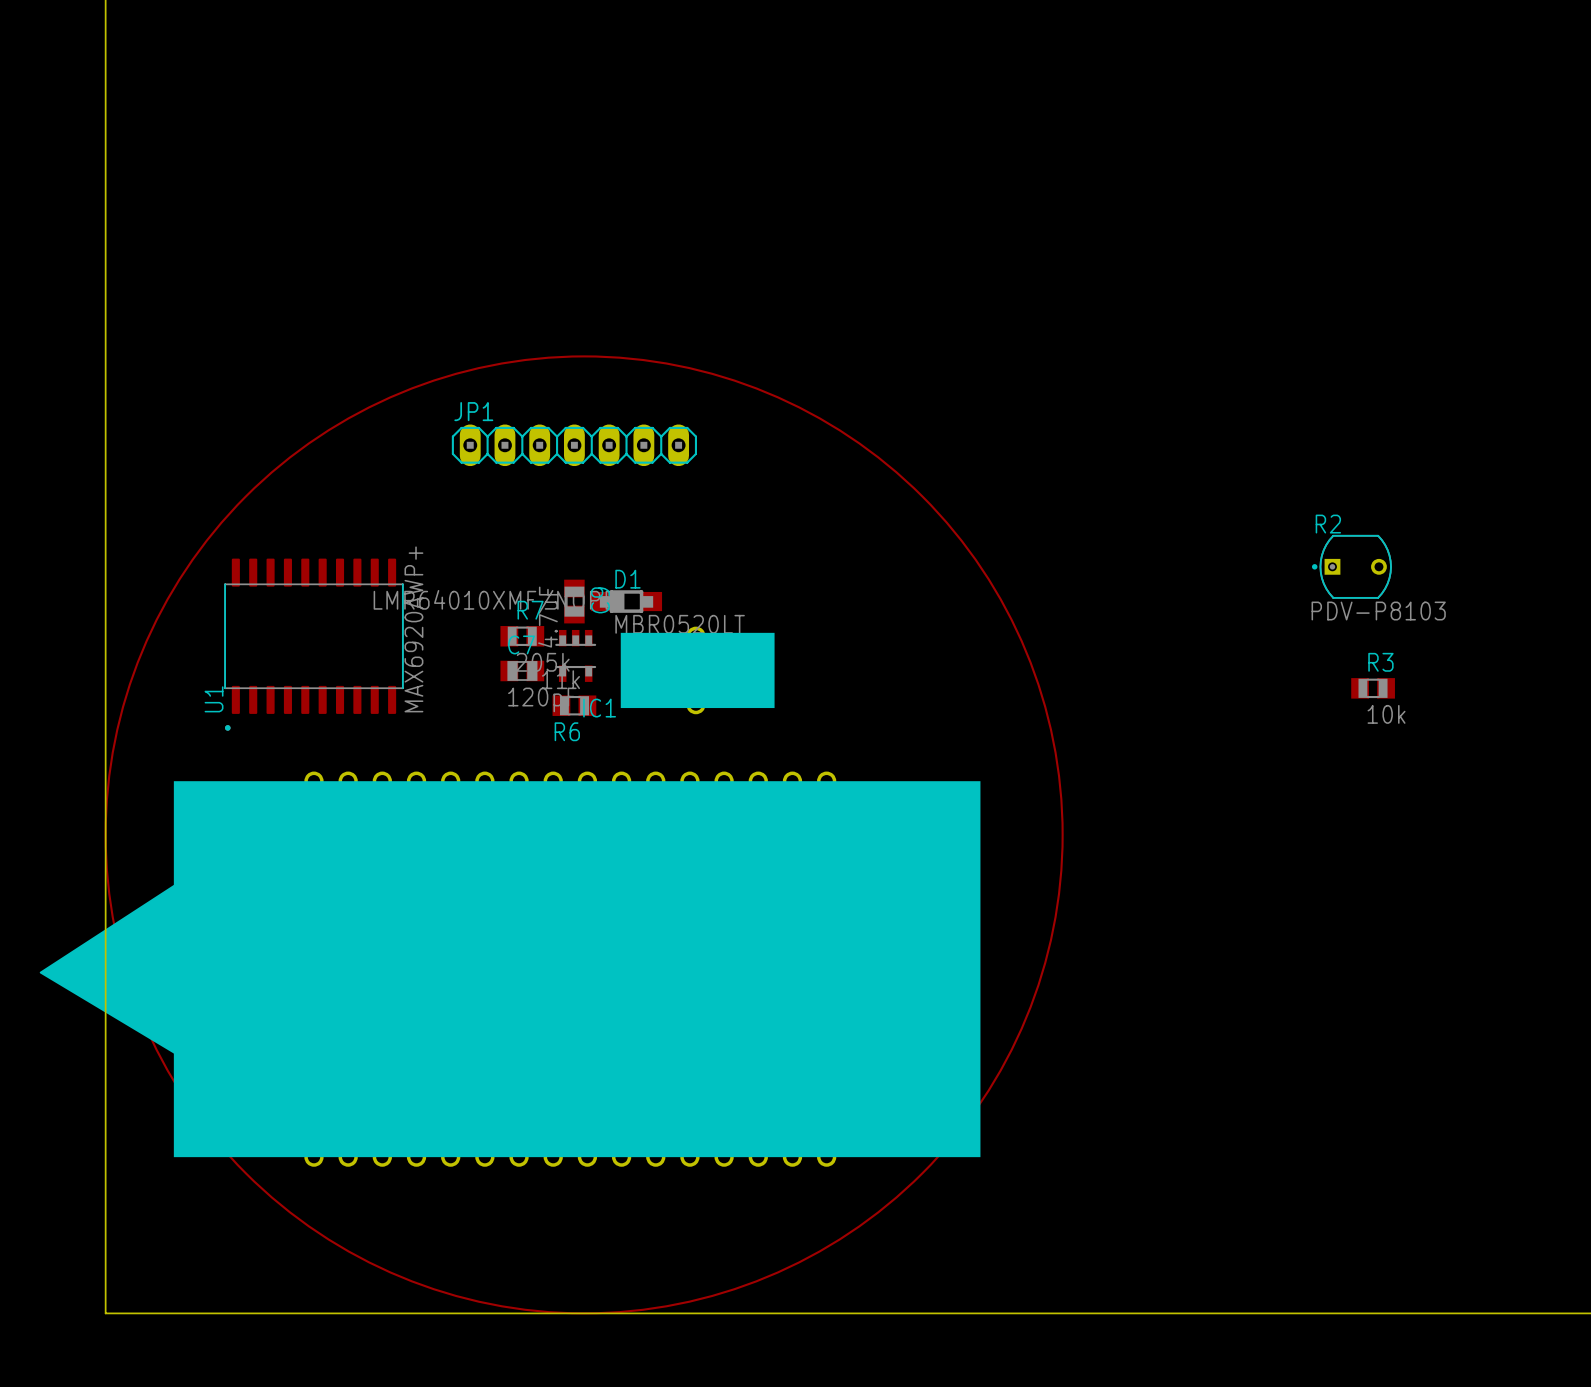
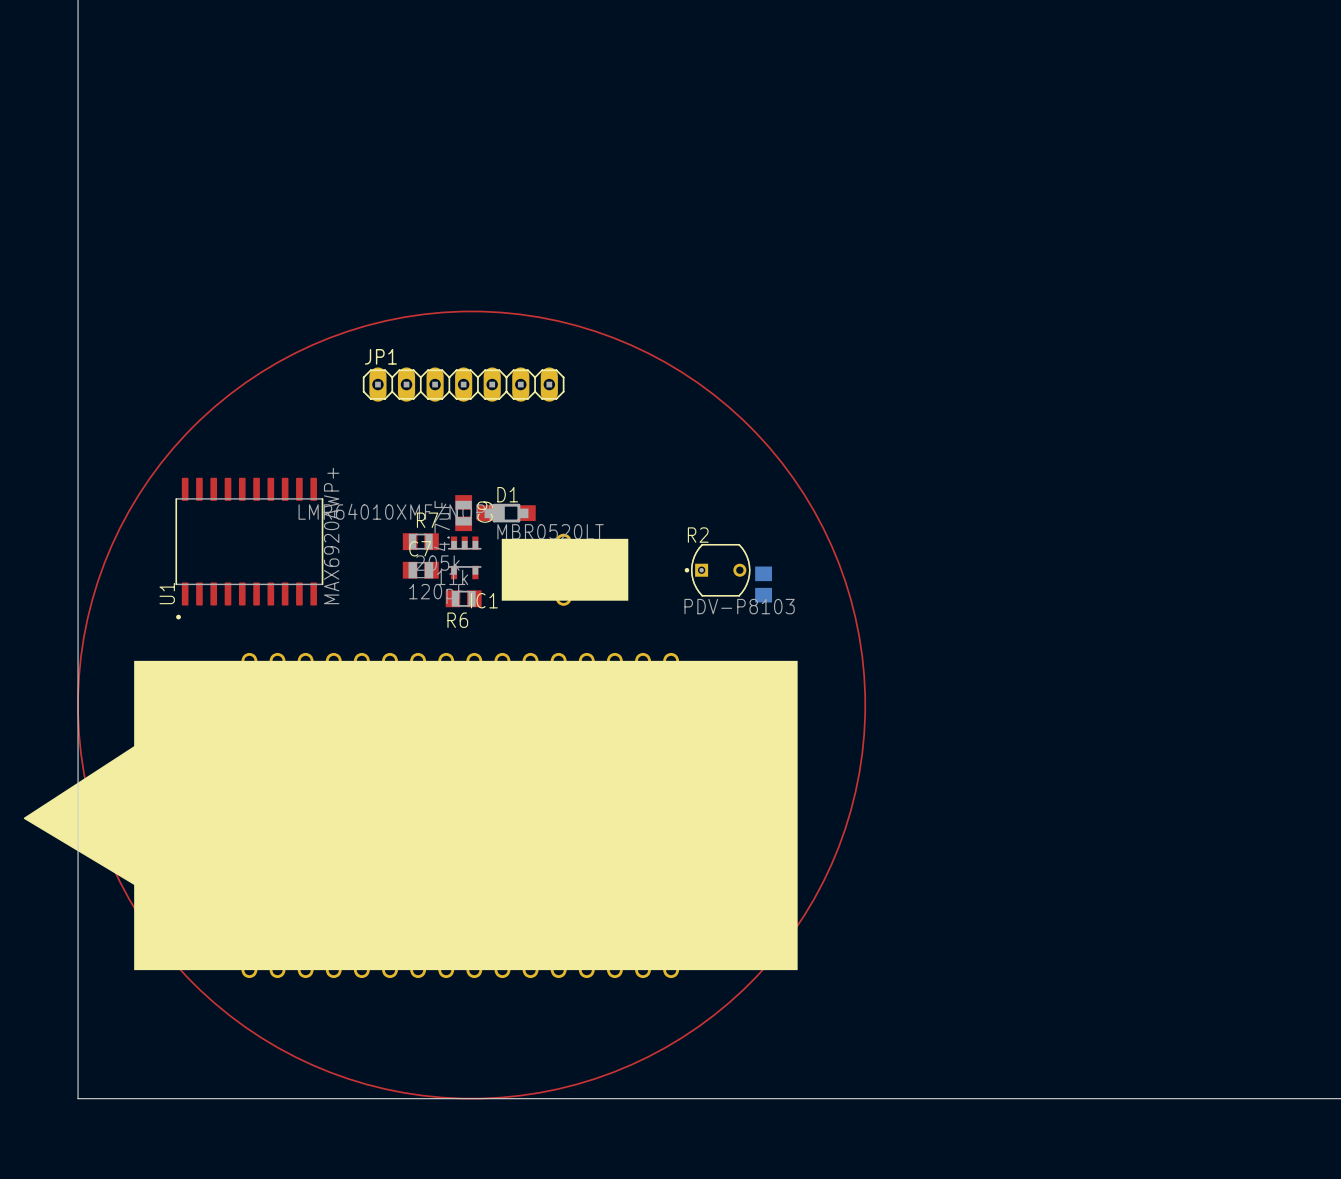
R2 position: (1351, 566) -> (717, 570)
part: none -> (763, 584)
R3: 10k (1373, 688) -> none

